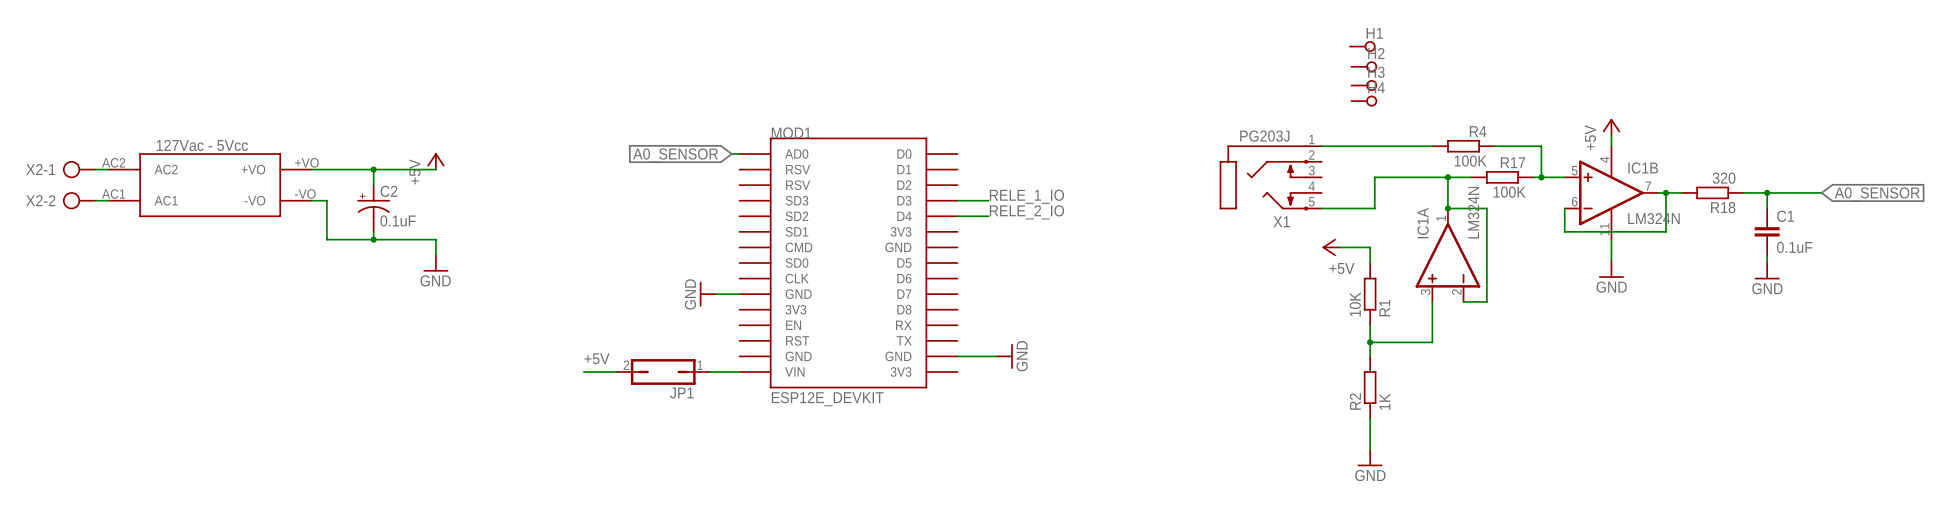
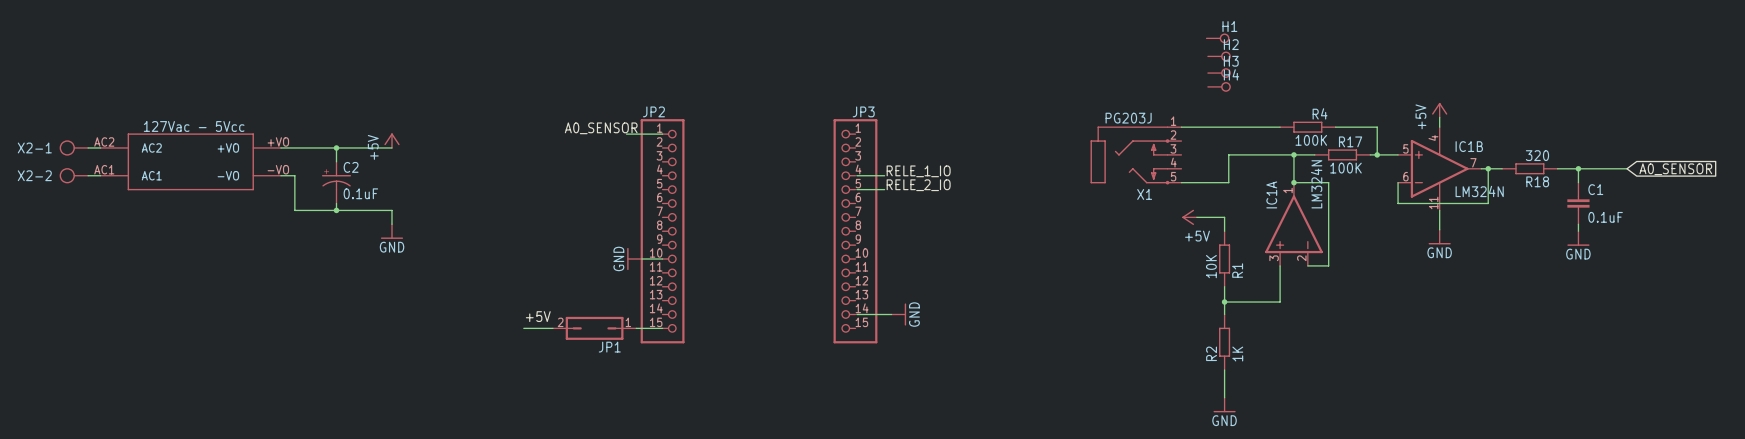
label: none -> A0_SENSOR (601, 128)
wire: none -> (626, 134) (655, 134)
global label: A0_SENSOR (675, 155) -> none
JP2: none -> (662, 231)
MOD1: ESP12E_DEVKIT (848, 263) -> none
JP3: none -> (855, 231)

